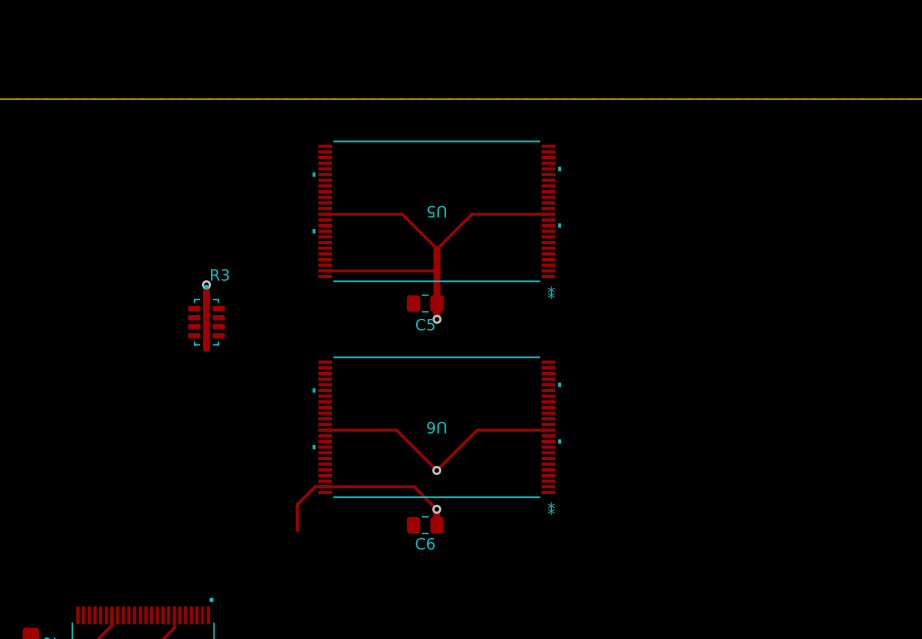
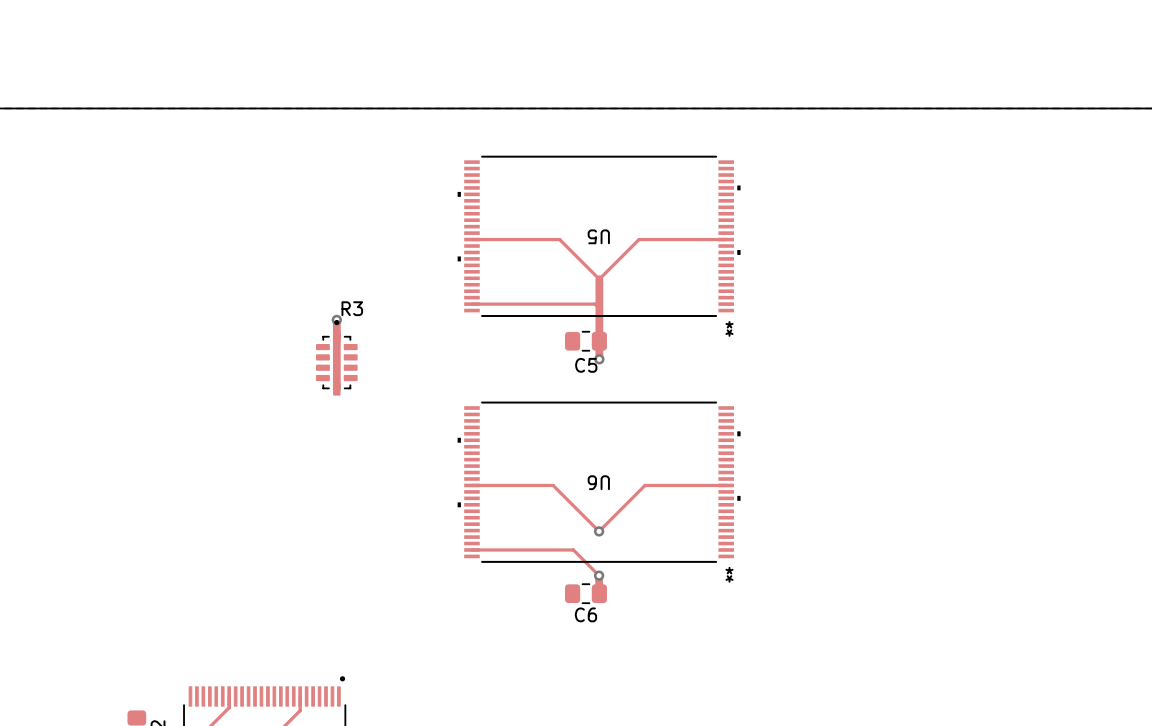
track: (325, 486) (315, 486) (297, 504) (297, 530) -> none

